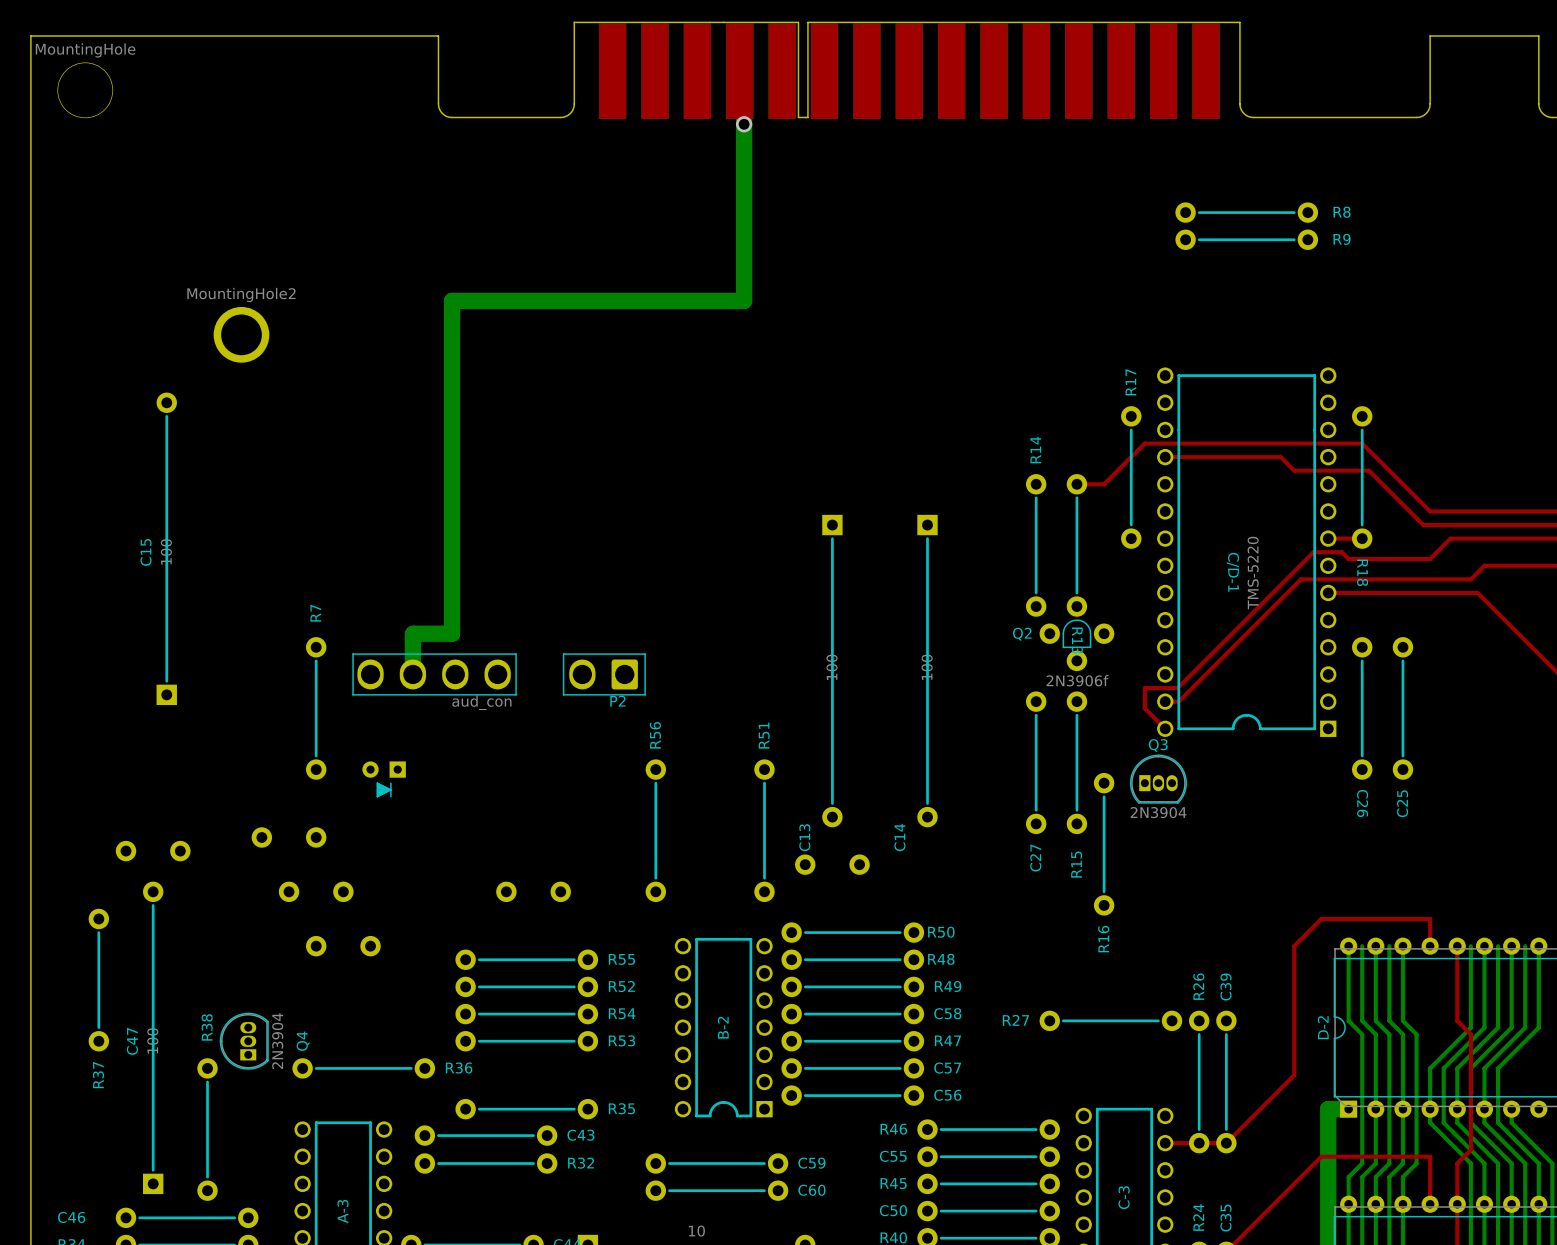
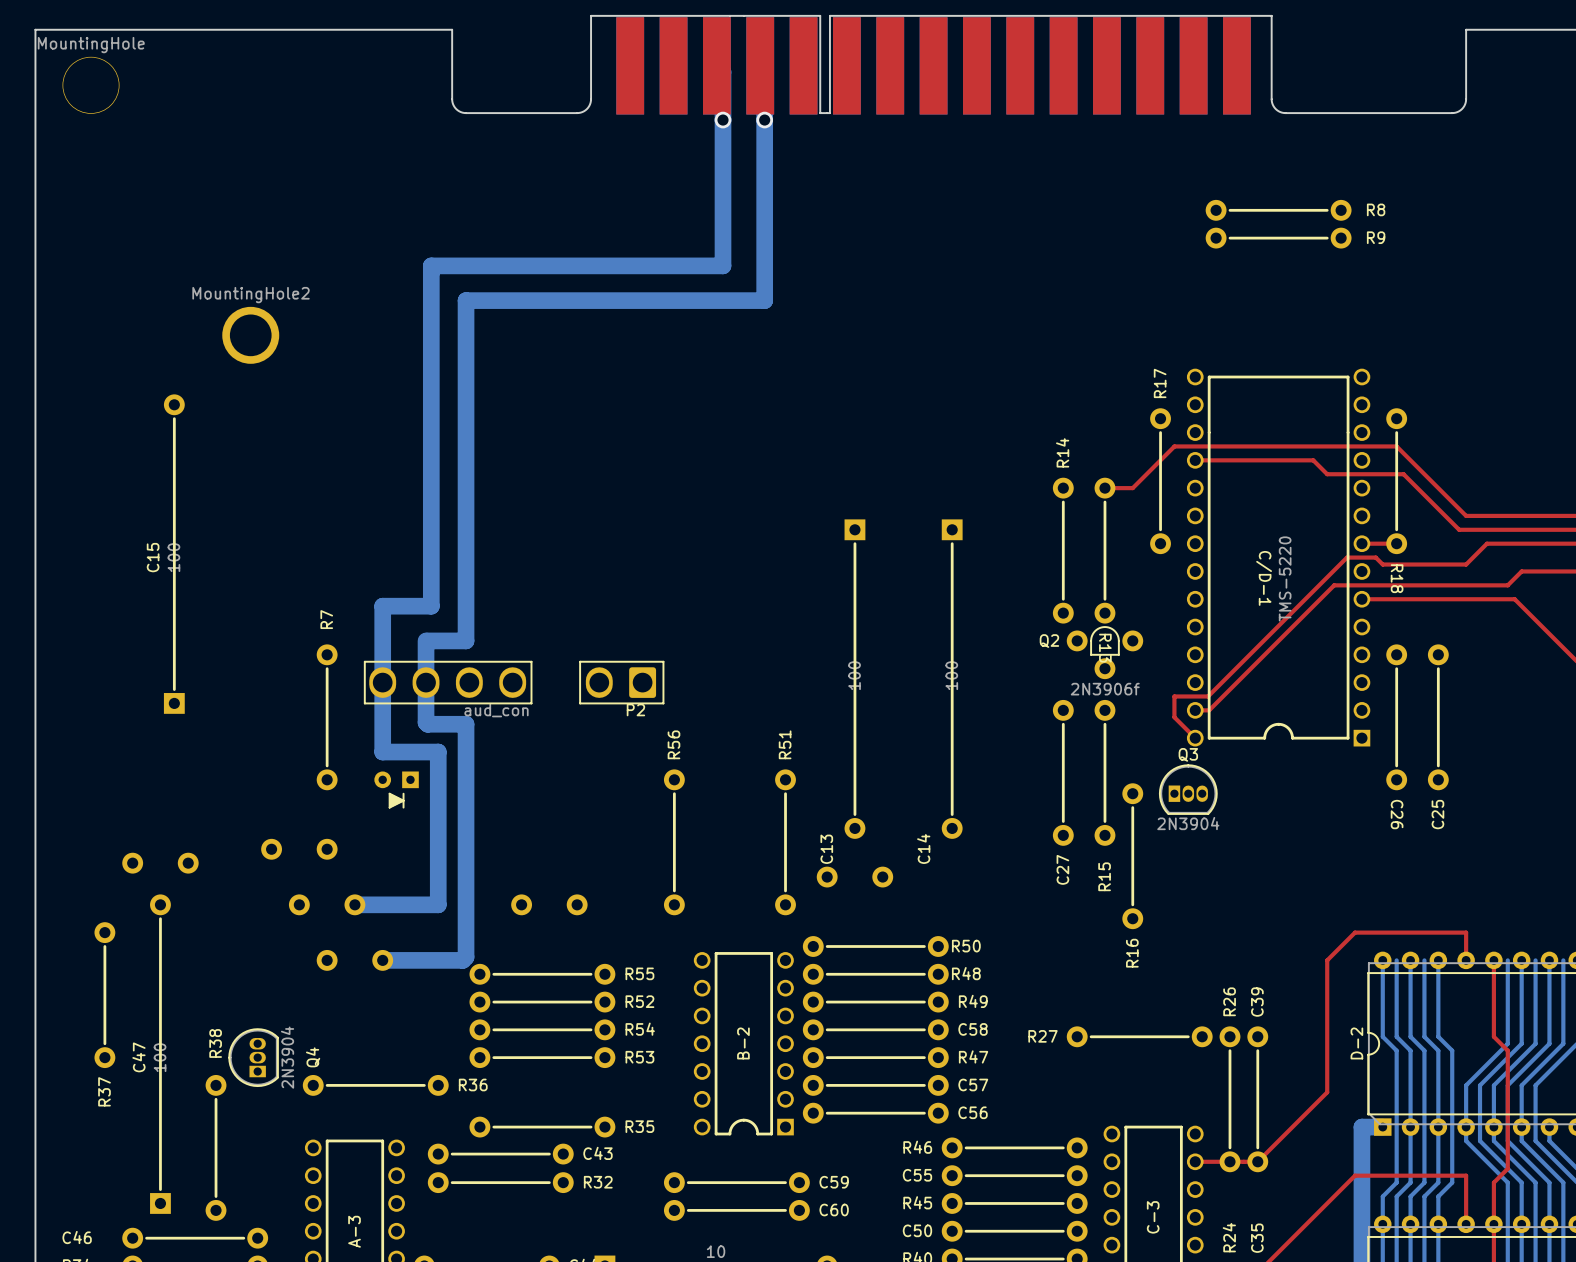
bottom track: none -> (716, 65) (723, 71) (723, 265) (431, 265) (431, 606) (382, 606) (382, 752) (438, 752) (438, 904) (354, 904)
via: none -> (723, 120)
bottom track: none -> (426, 682) (426, 722) (427, 724) (466, 724) (466, 957) (462, 960) (382, 960)

